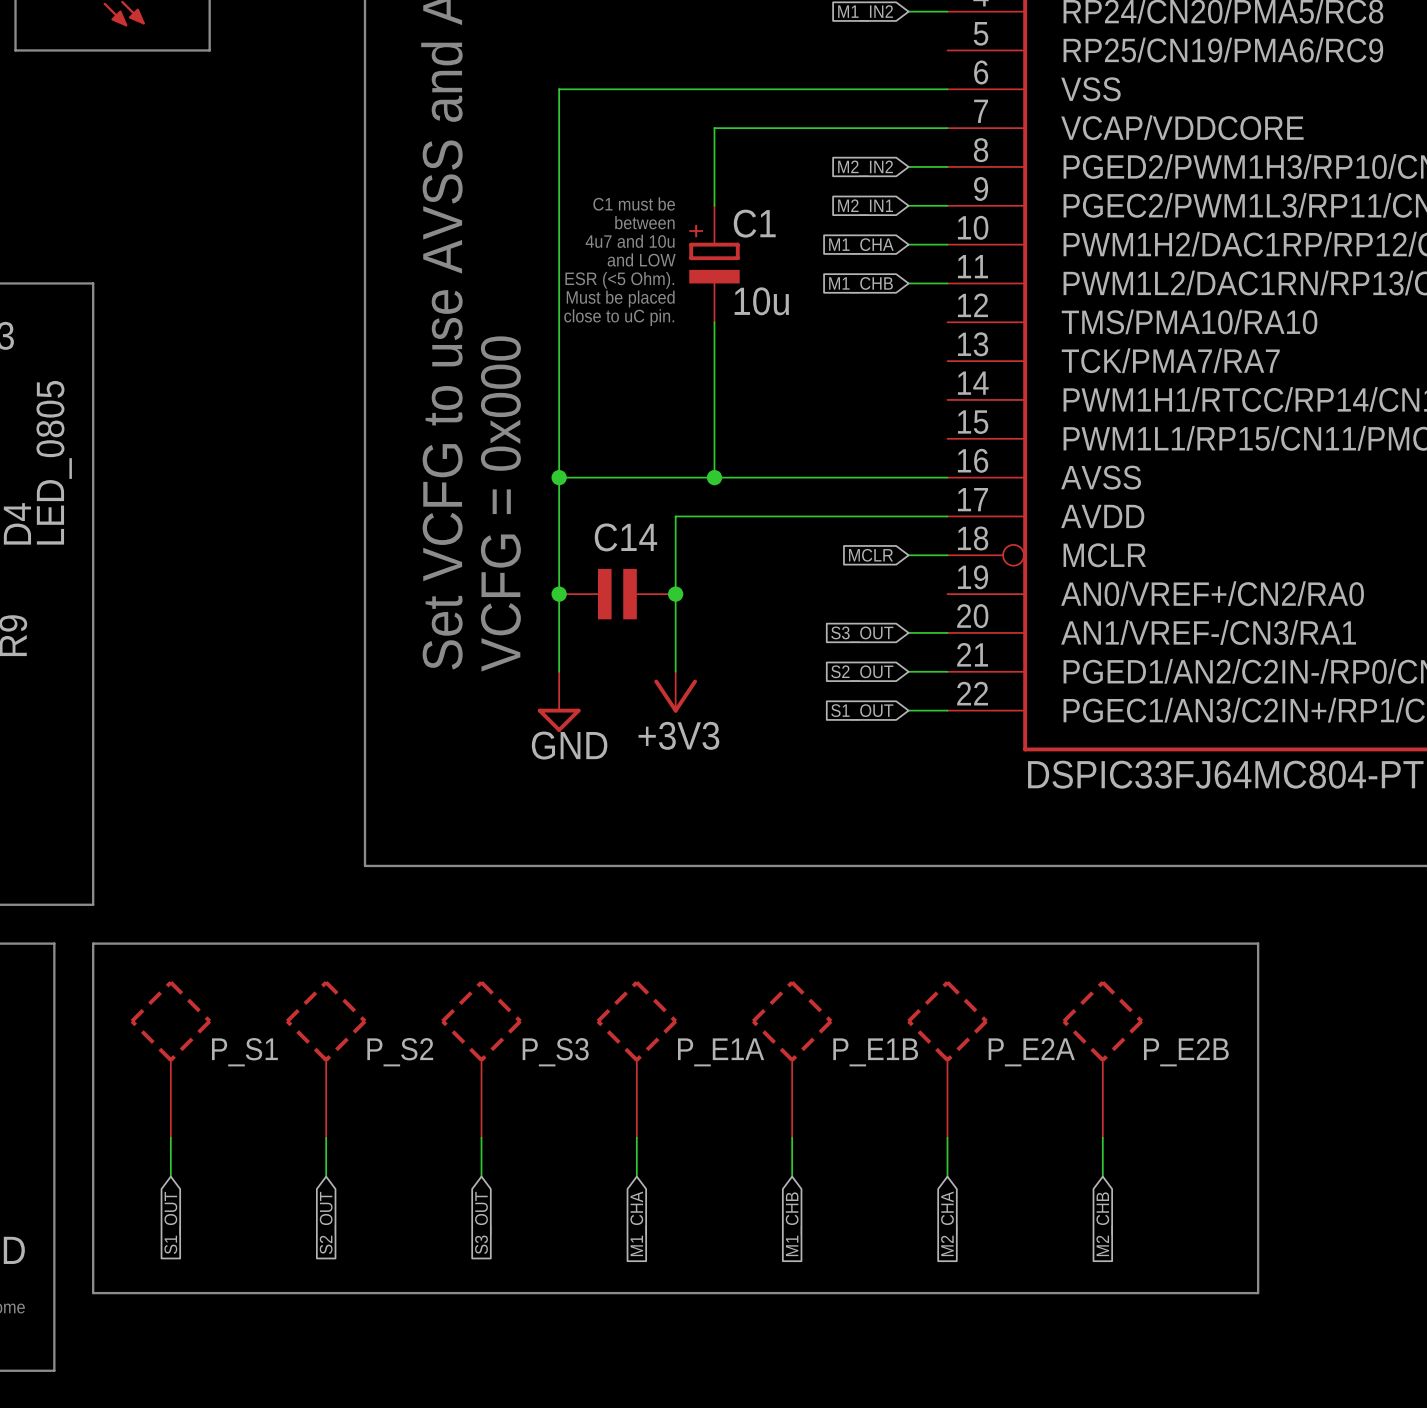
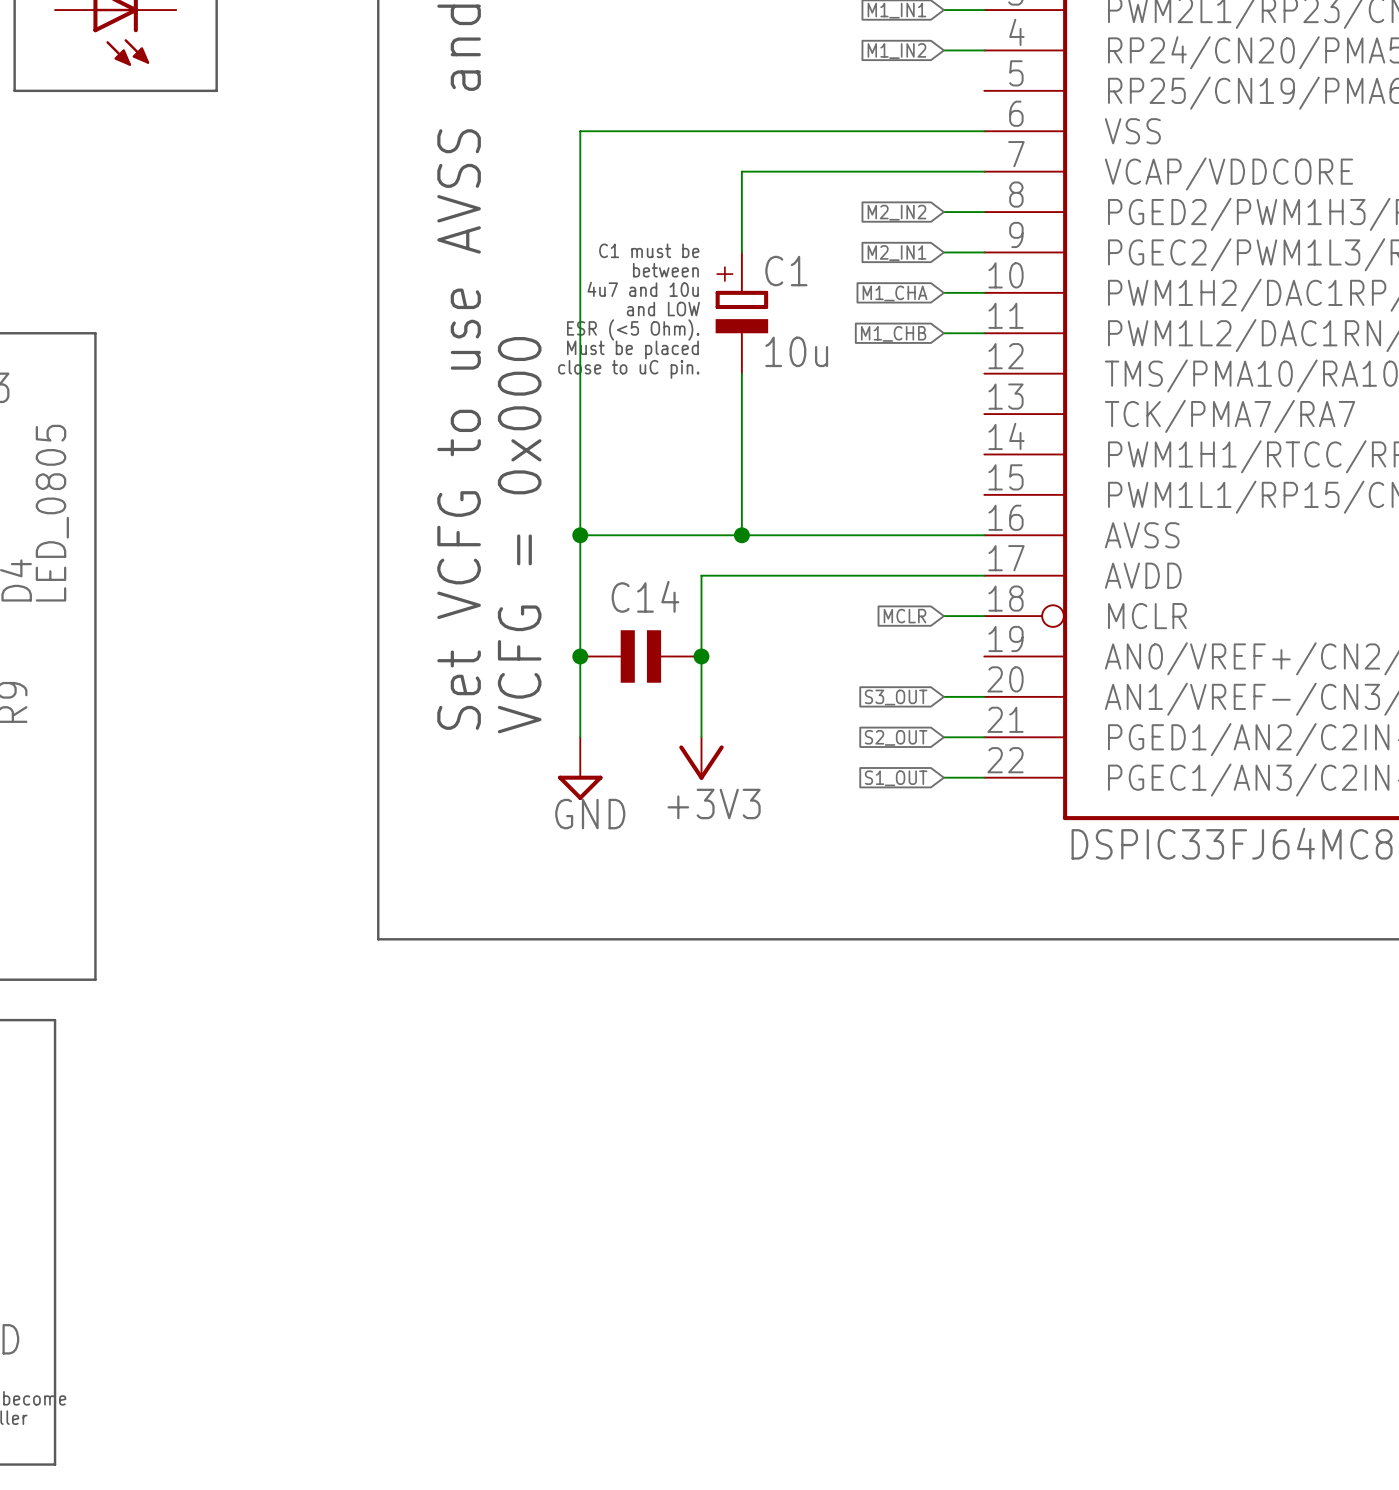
line: (93, 943) (93, 1293) (1258, 1293) (1258, 943) (93, 943) -> none
P_S1: (170, 1059) -> none
P_S2: (326, 1059) -> none
P_S3: (481, 1059) -> none
P_E1A: (636, 1059) -> none
P_E1B: (792, 1059) -> none
P_E2A: (947, 1059) -> none
P_E2B: (1102, 1059) -> none
wire: (170, 1137) (170, 1176) -> none
wire: (326, 1137) (326, 1176) -> none
wire: (481, 1137) (481, 1176) -> none
wire: (636, 1137) (636, 1176) -> none
wire: (792, 1137) (792, 1176) -> none
wire: (947, 1137) (947, 1176) -> none
wire: (1102, 1137) (1102, 1176) -> none
global label: S1_OUT (172, 1222) -> none
global label: S2_OUT (327, 1222) -> none
global label: S3_OUT (483, 1222) -> none
global label: M1_CHA (638, 1223) -> none
global label: M2_CHA (949, 1223) -> none
global label: M1_CHB (793, 1224) -> none
global label: M2_CHB (1104, 1224) -> none

